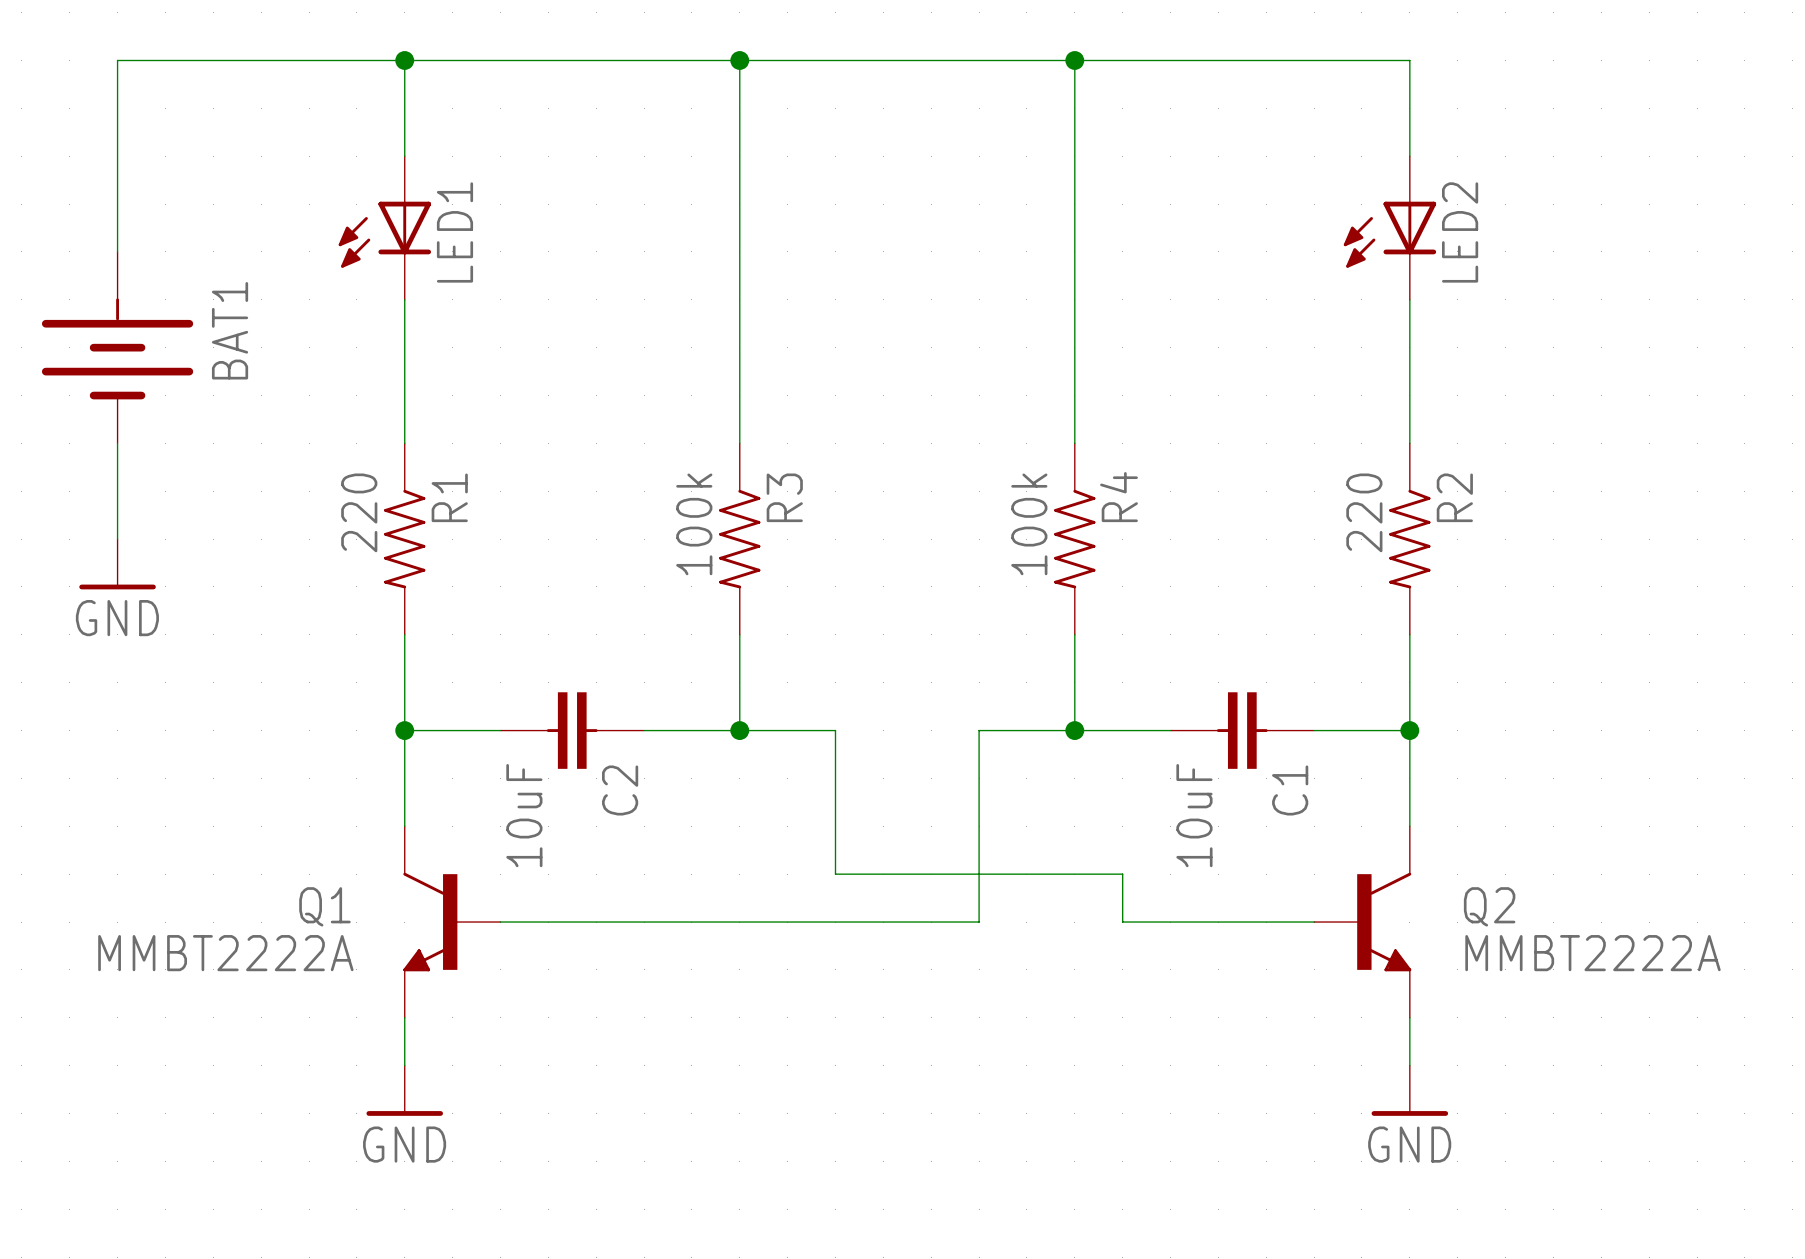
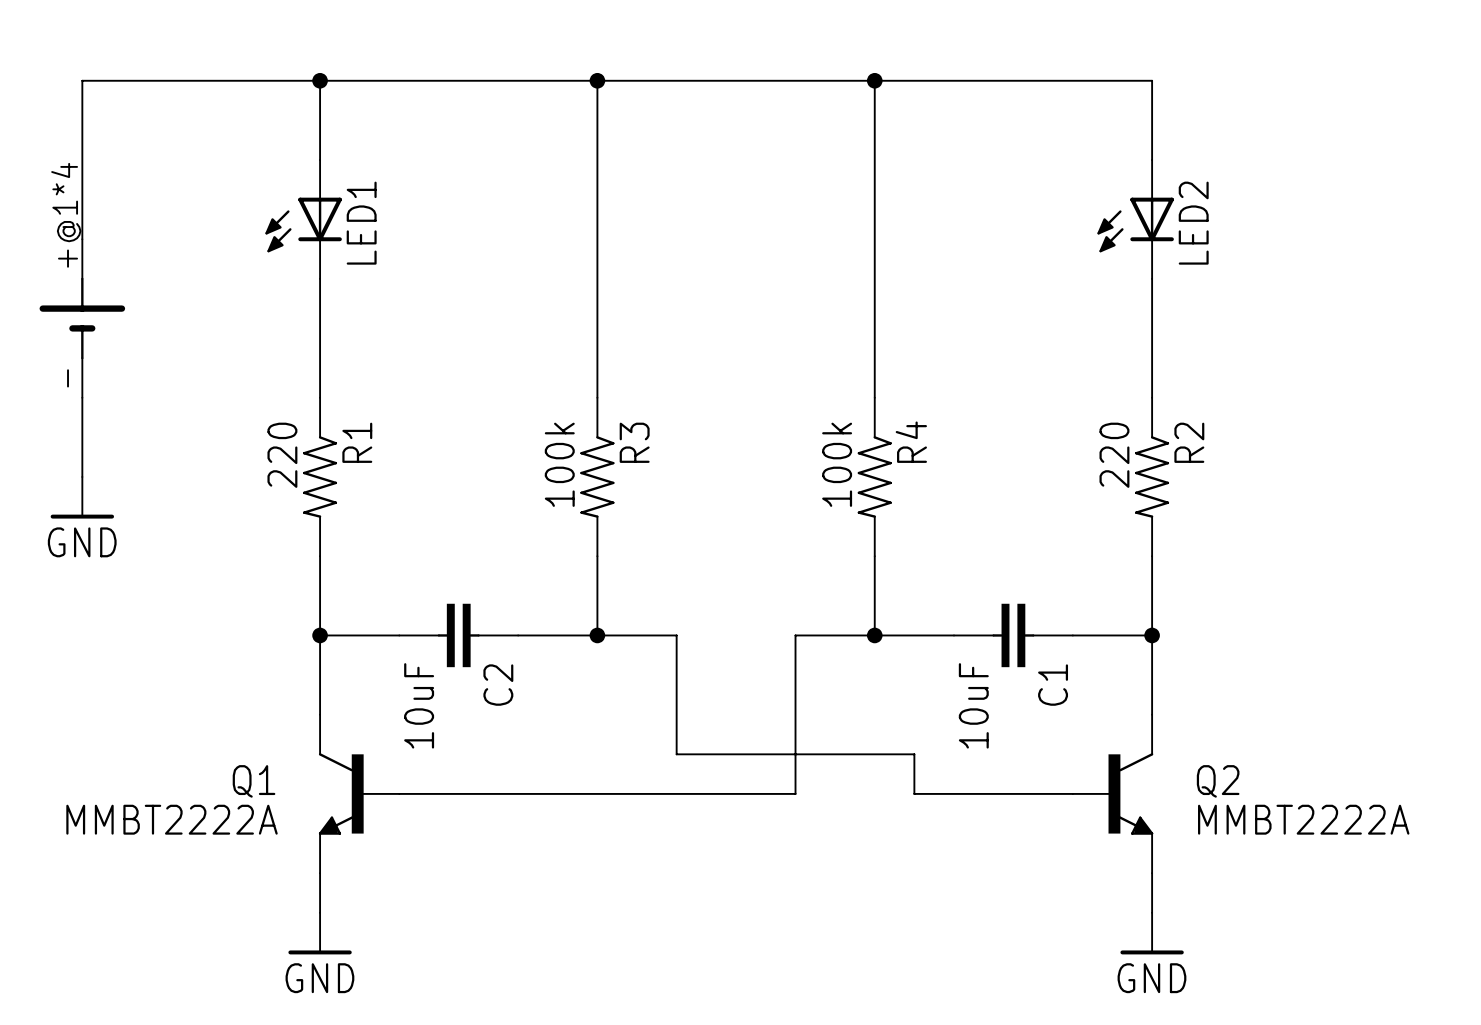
BAT1: (117, 347) -> none
part: none -> (82, 318)

